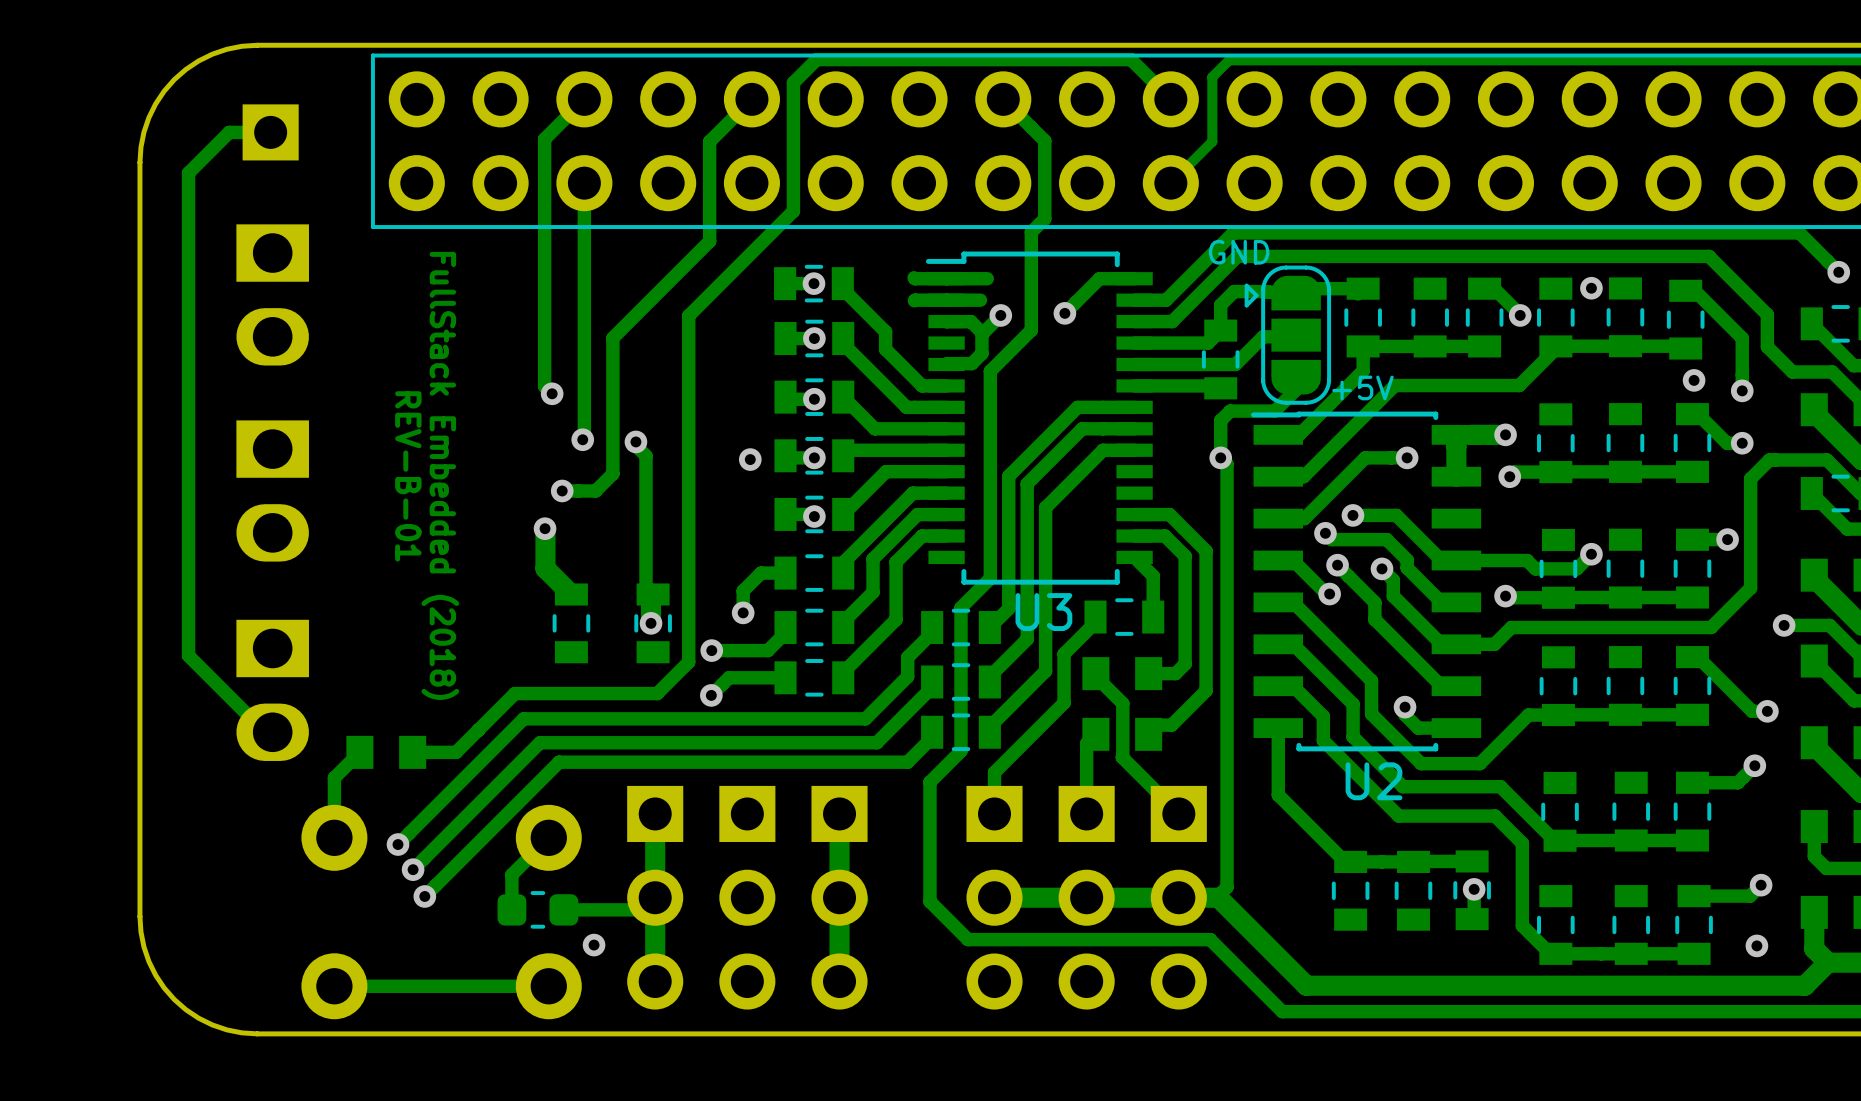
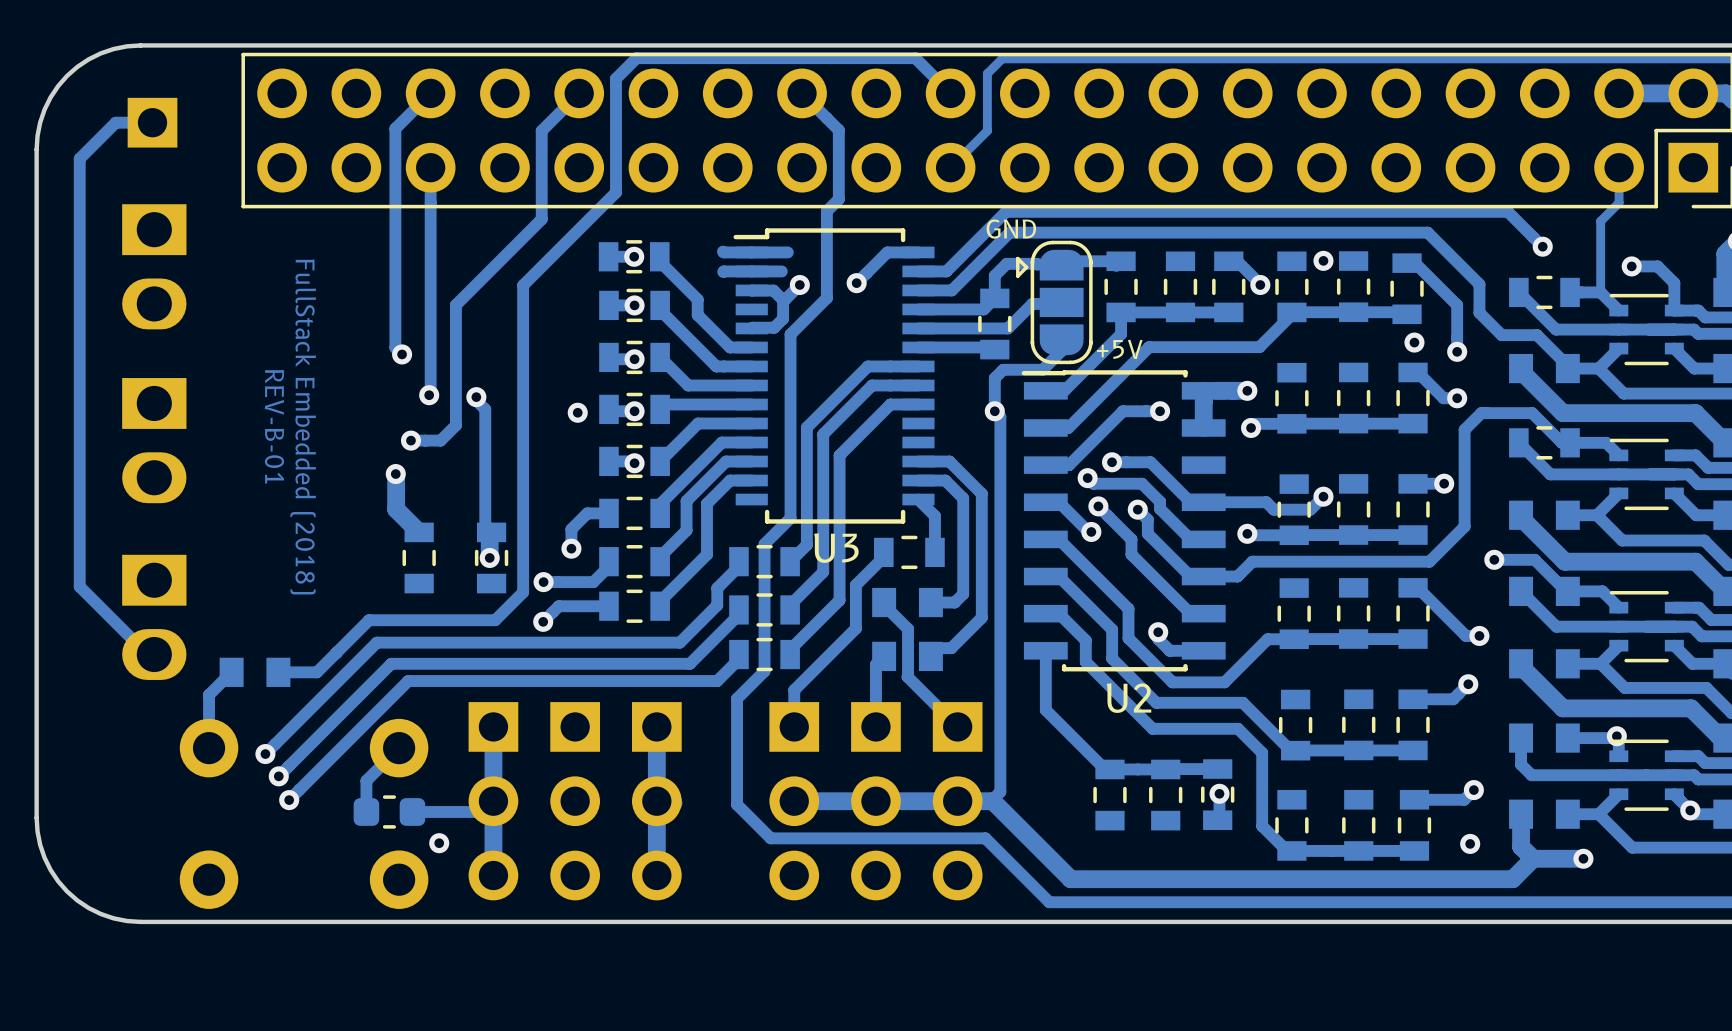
track: (548, 986) (334, 986) -> none

